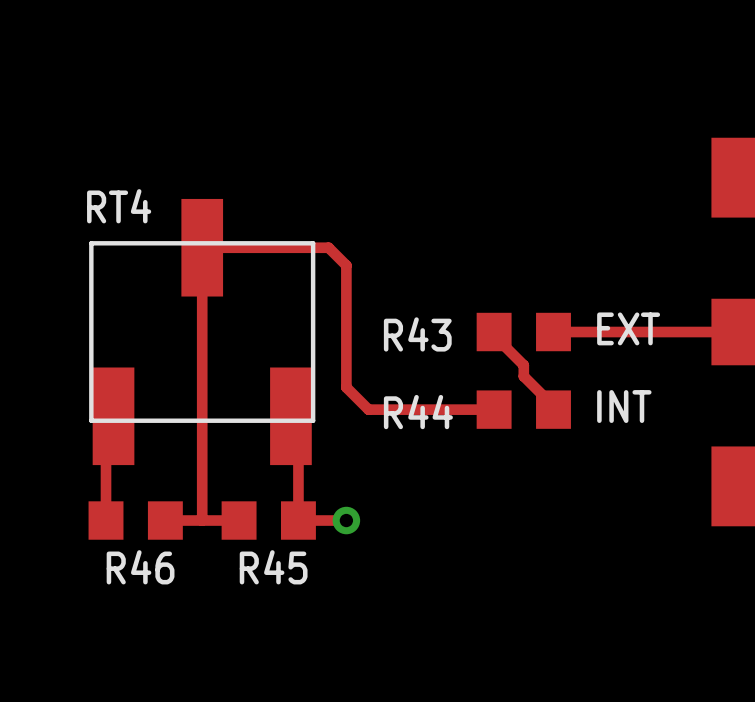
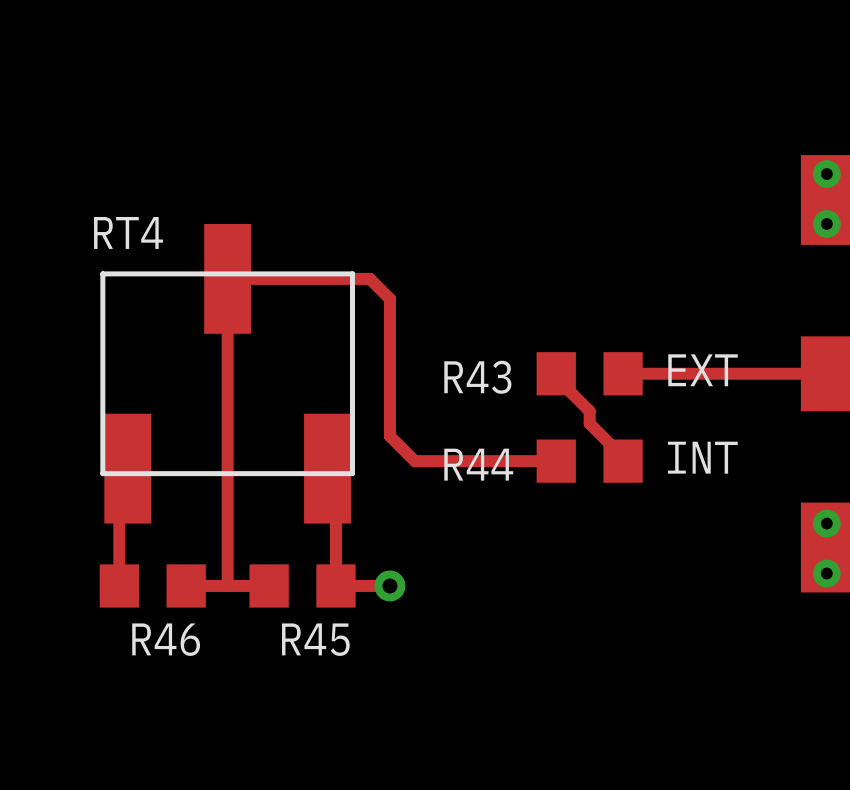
via: none -> (826, 174)
via: none -> (826, 223)
via: none -> (826, 523)
via: none -> (826, 573)

